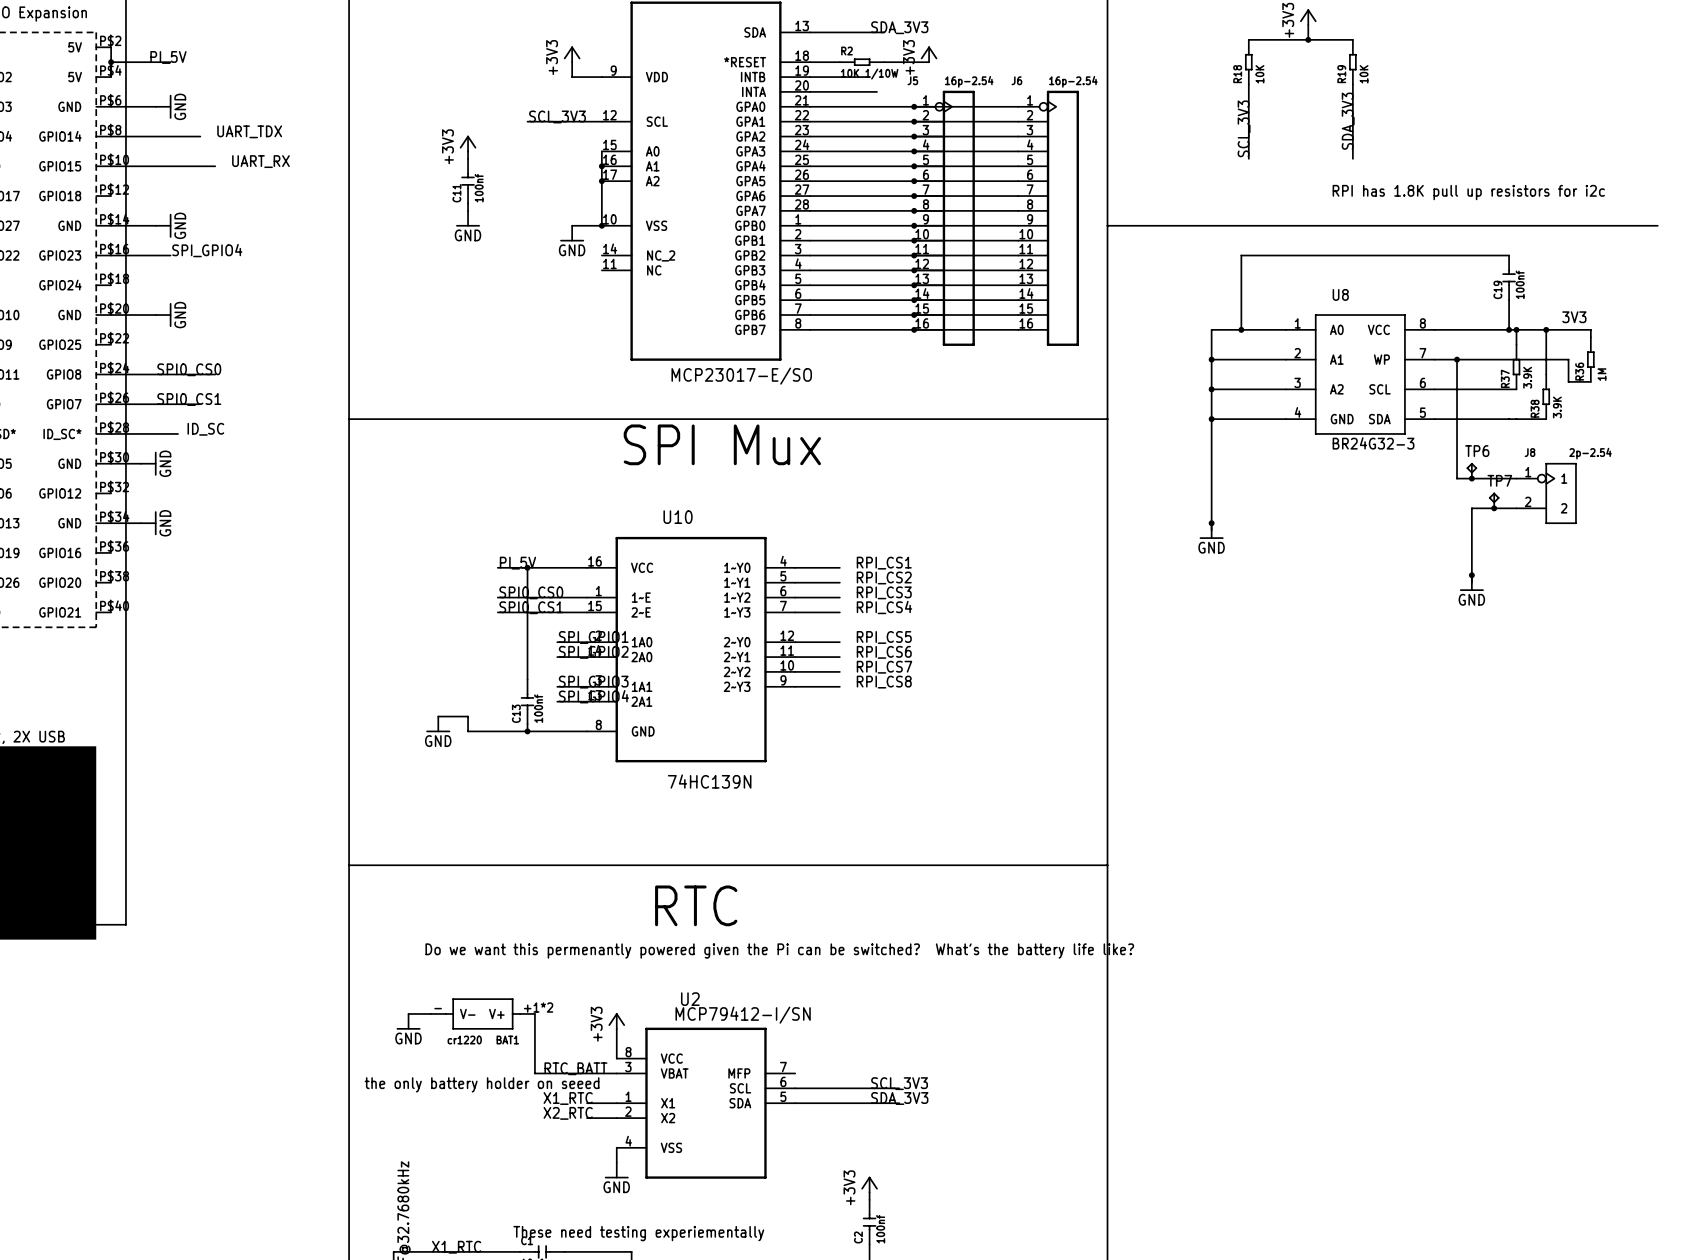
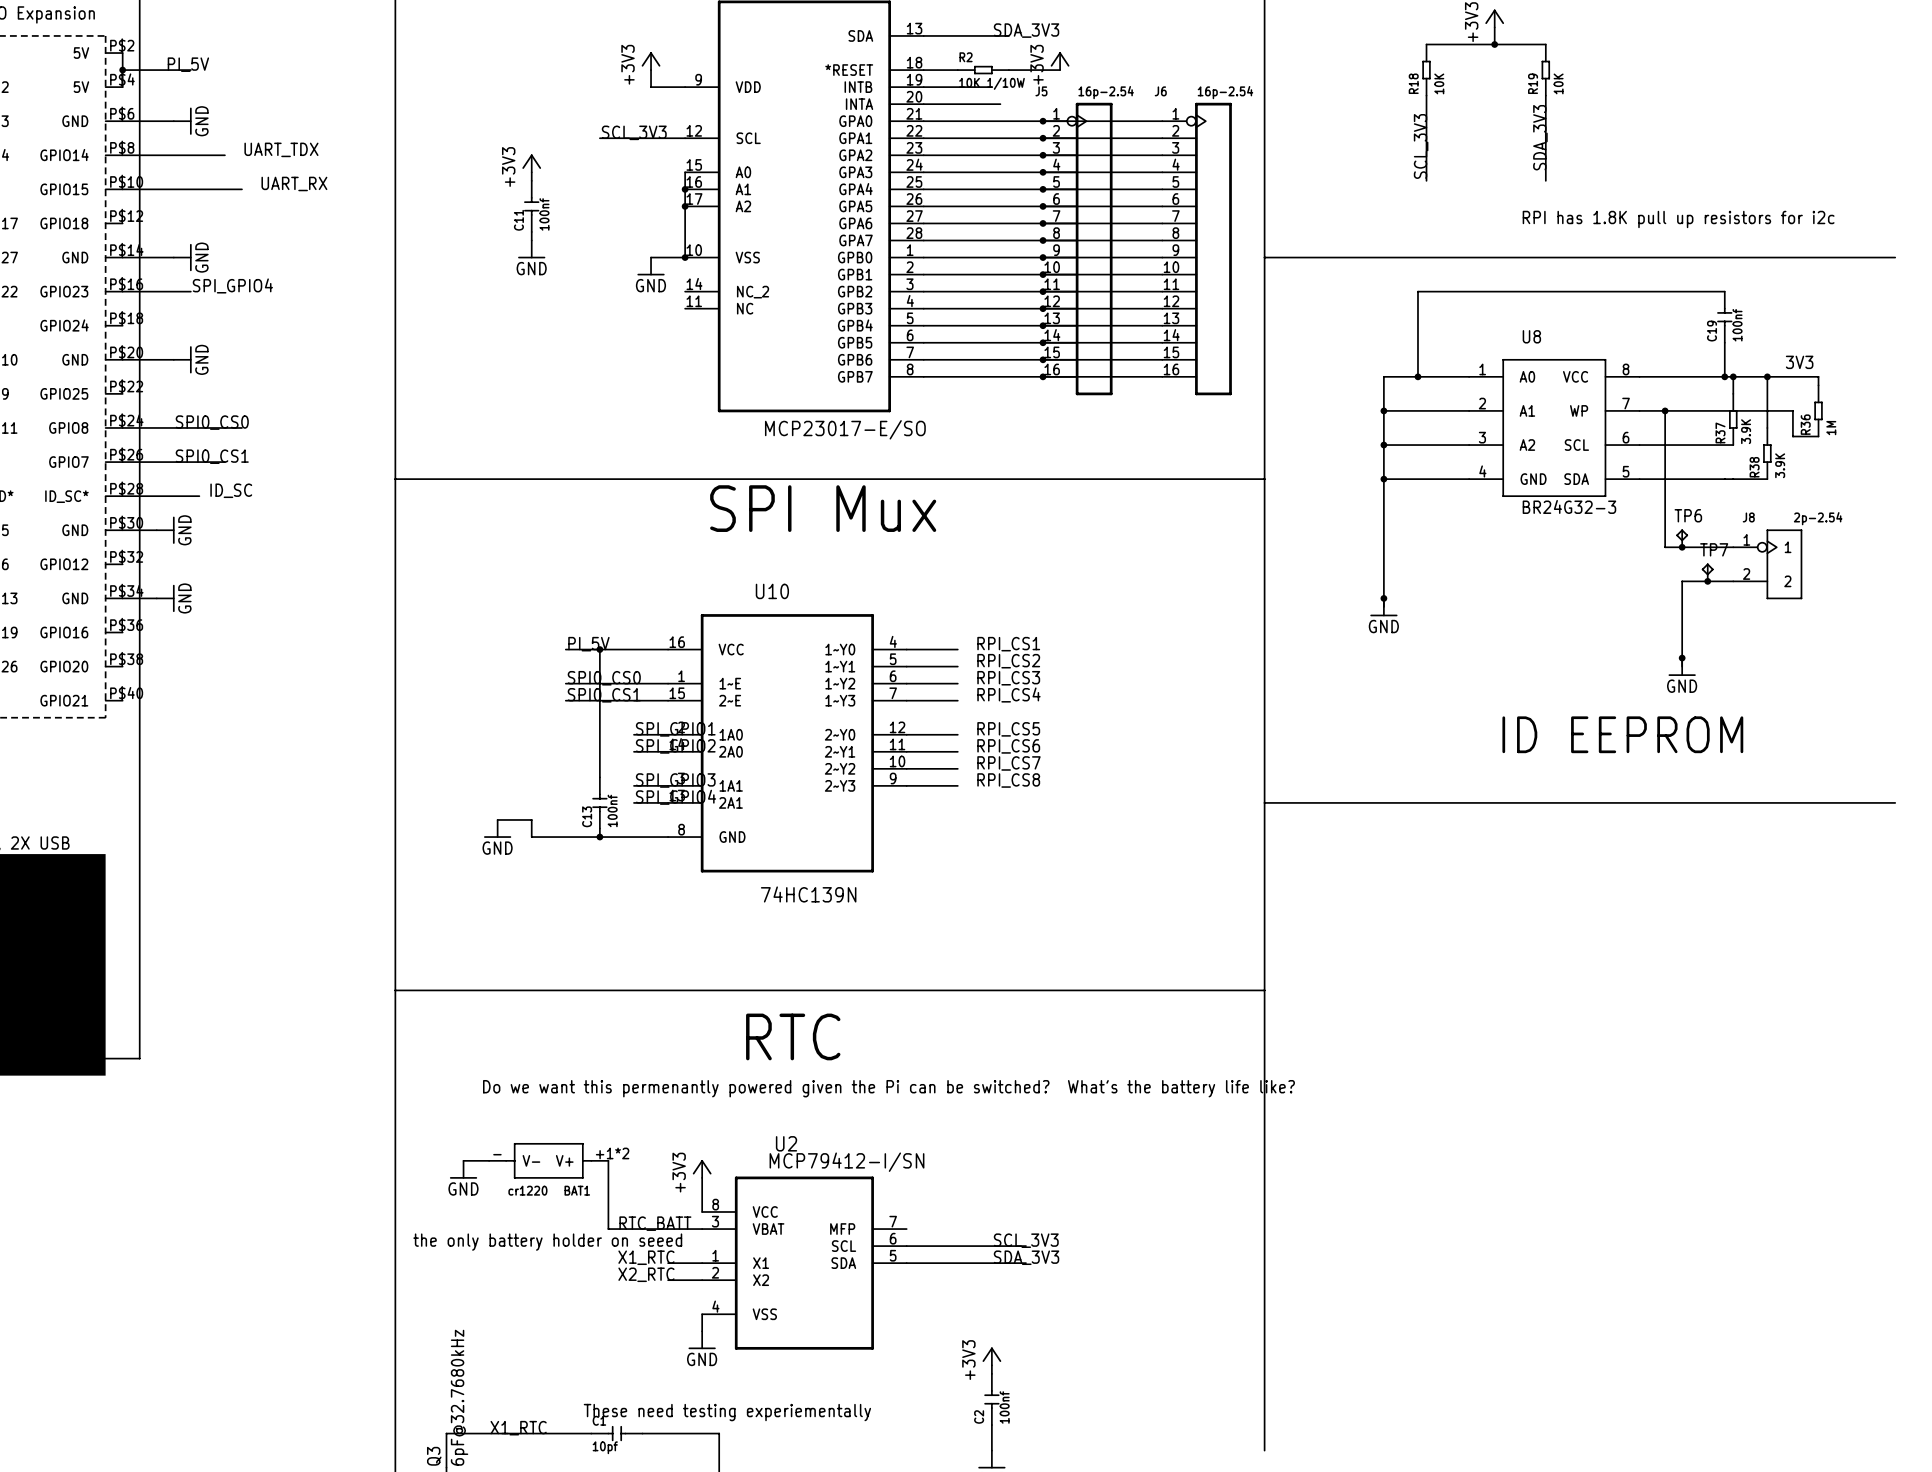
text: none -> ID EEPROM (1622, 734)
line: none -> (1264, 802) (1895, 802)

